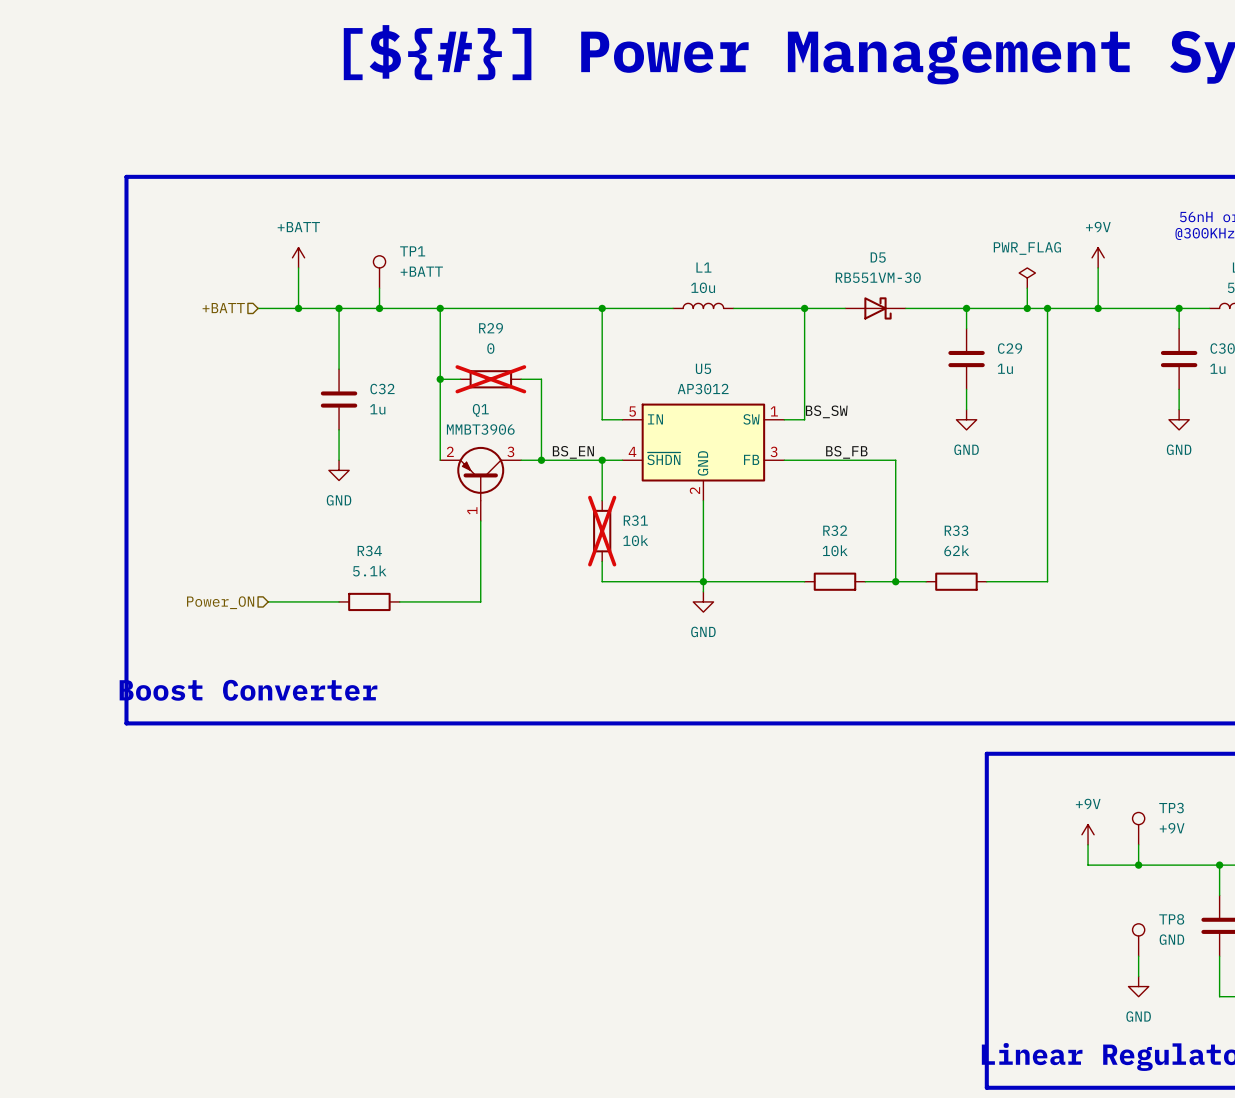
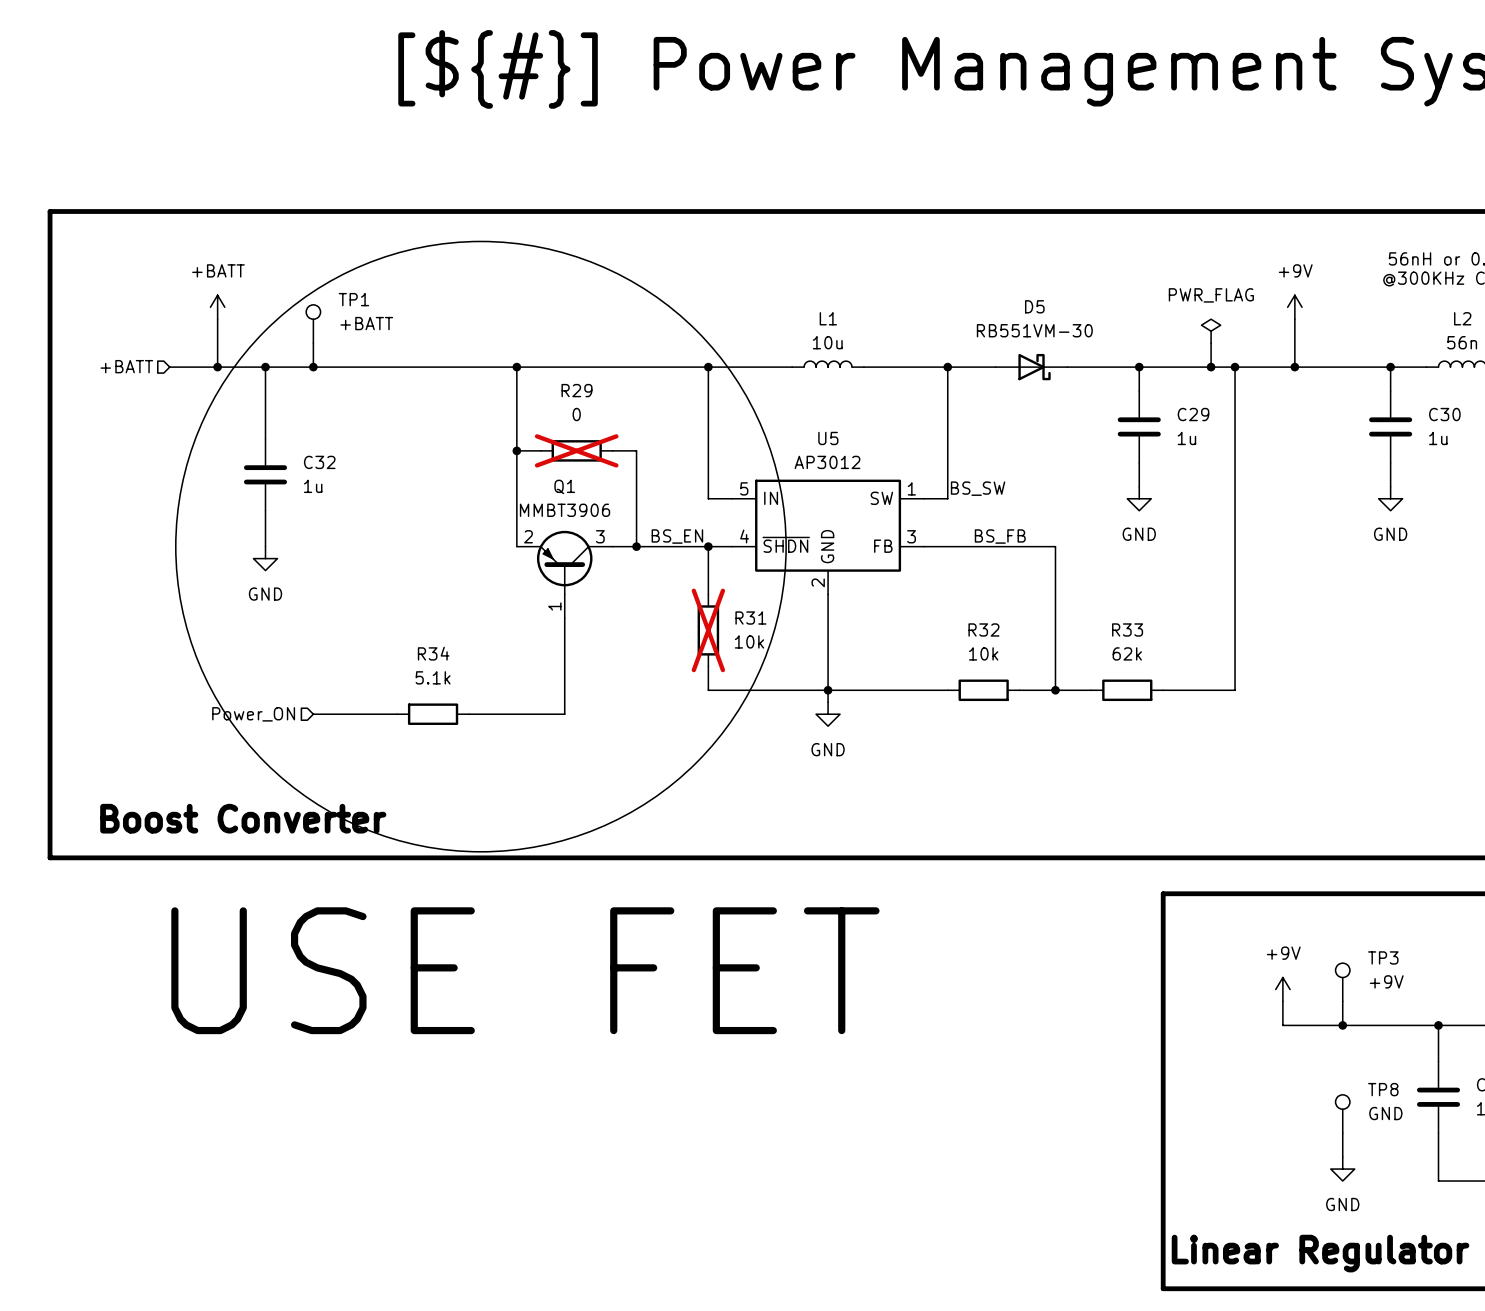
line: (126, 176) (126, 723) -> (145, 211) (50, 211) (50, 857) (145, 857)
drawing: none -> [175, 241, 787, 852]
power symbol position: +BATT (298, 257) -> +BATT (217, 307)
wire: (298, 267) (298, 308) -> (217, 319) (217, 367)
TP1 position: (379, 272) -> (313, 324)
wire: (379, 288) (379, 308) -> (313, 343) (313, 367)
wire: none -> (169, 367) (301, 367)
junction: none -> (217, 367)
hierarchical label position: +BATT (223, 308) -> +BATT (126, 366)
junction: none -> (265, 367)
junction position: (298, 308) -> (313, 367)
wire: (339, 308) (339, 369) -> (265, 367) (265, 438)
junction: (339, 308) -> none
junction: (379, 308) -> none
C32 position: (339, 399) -> (265, 474)
wire: (339, 429) (339, 460) -> (265, 510) (265, 546)
power symbol position: GND (339, 470) -> GND (265, 558)
text position: Boost Converter (248, 690) -> Boost Converter (243, 818)
text: none -> USE FET (525, 970)

